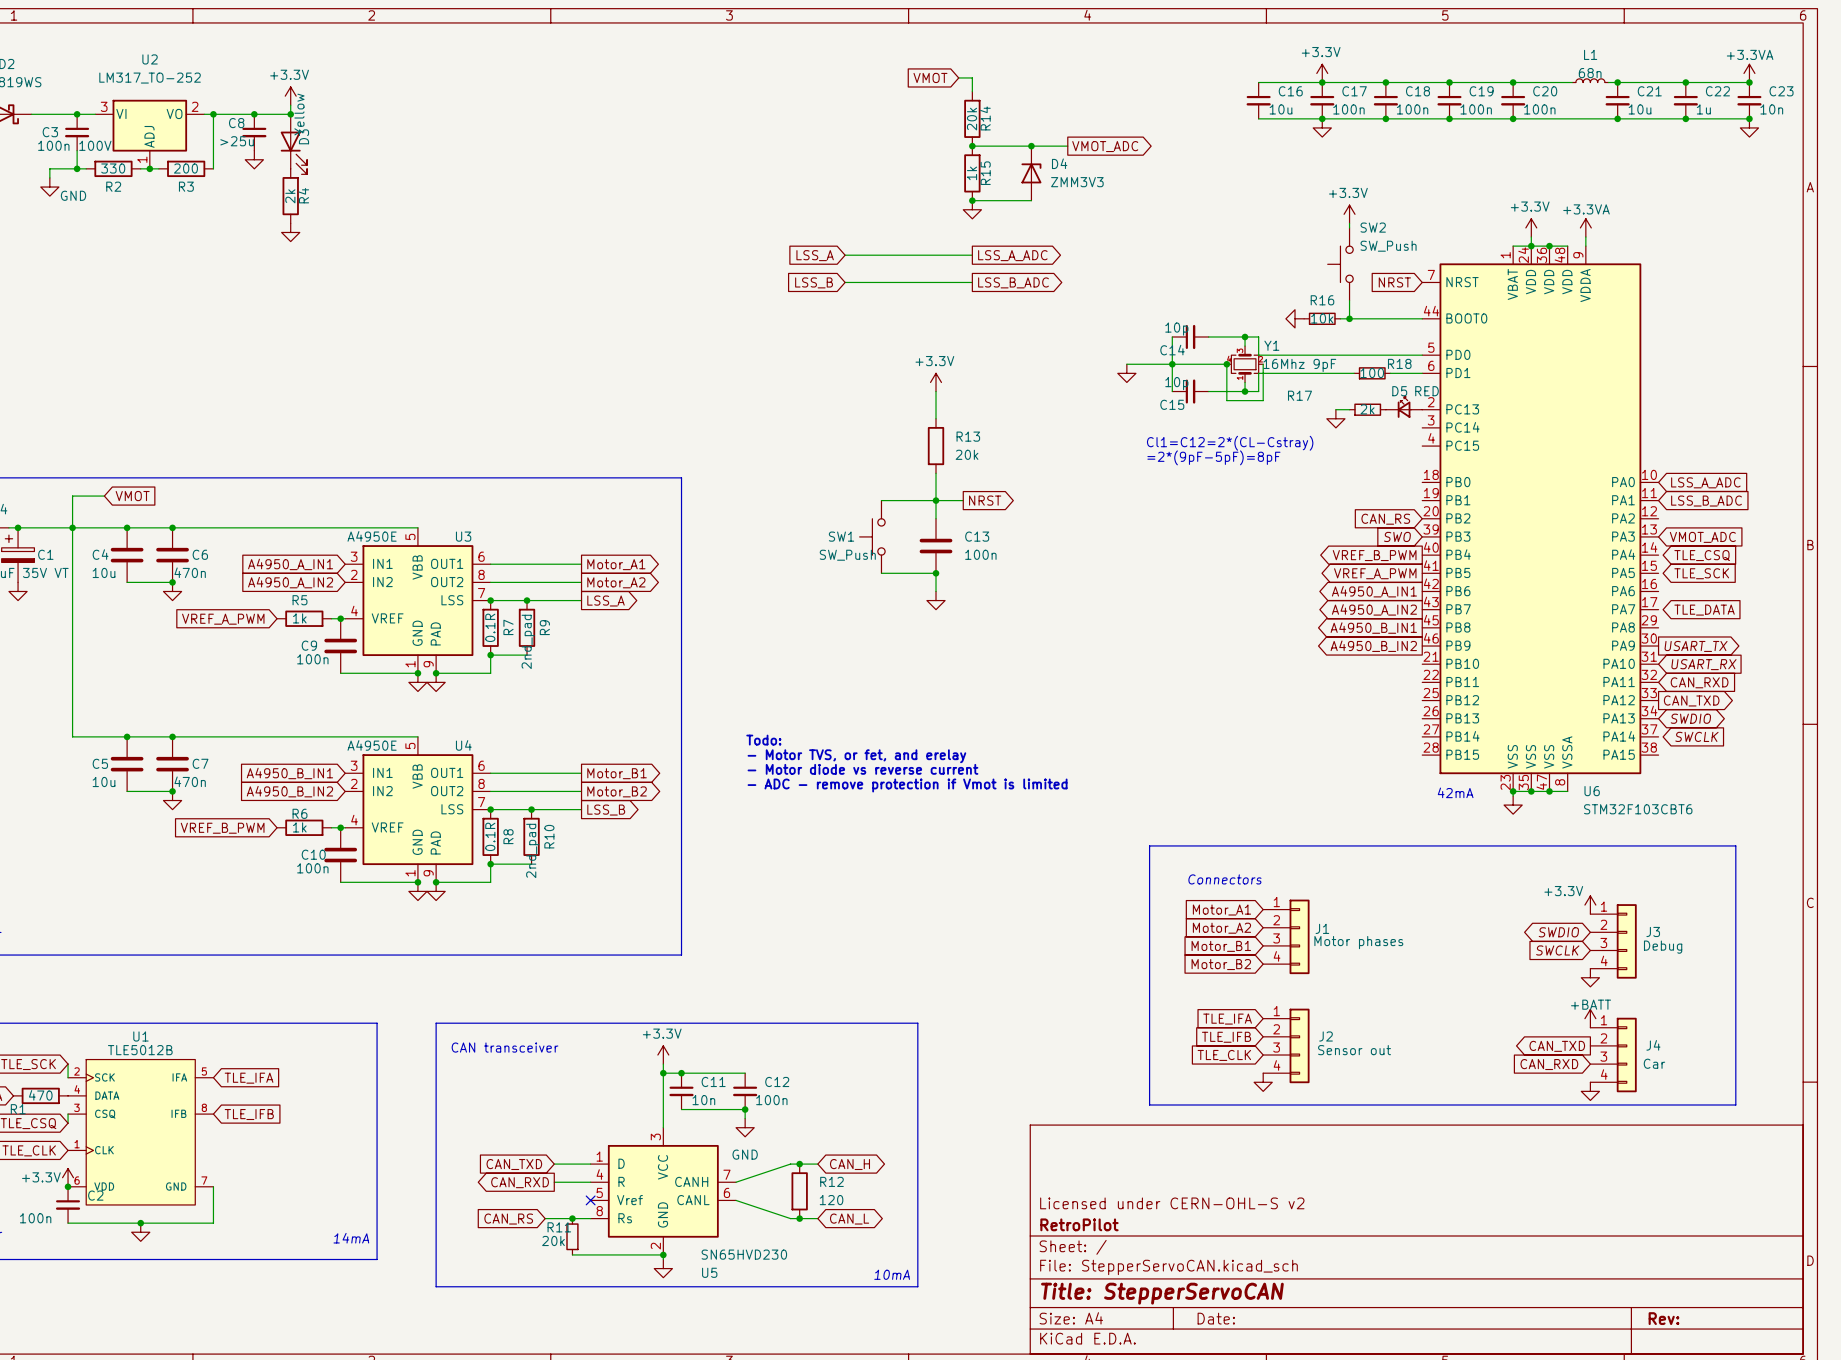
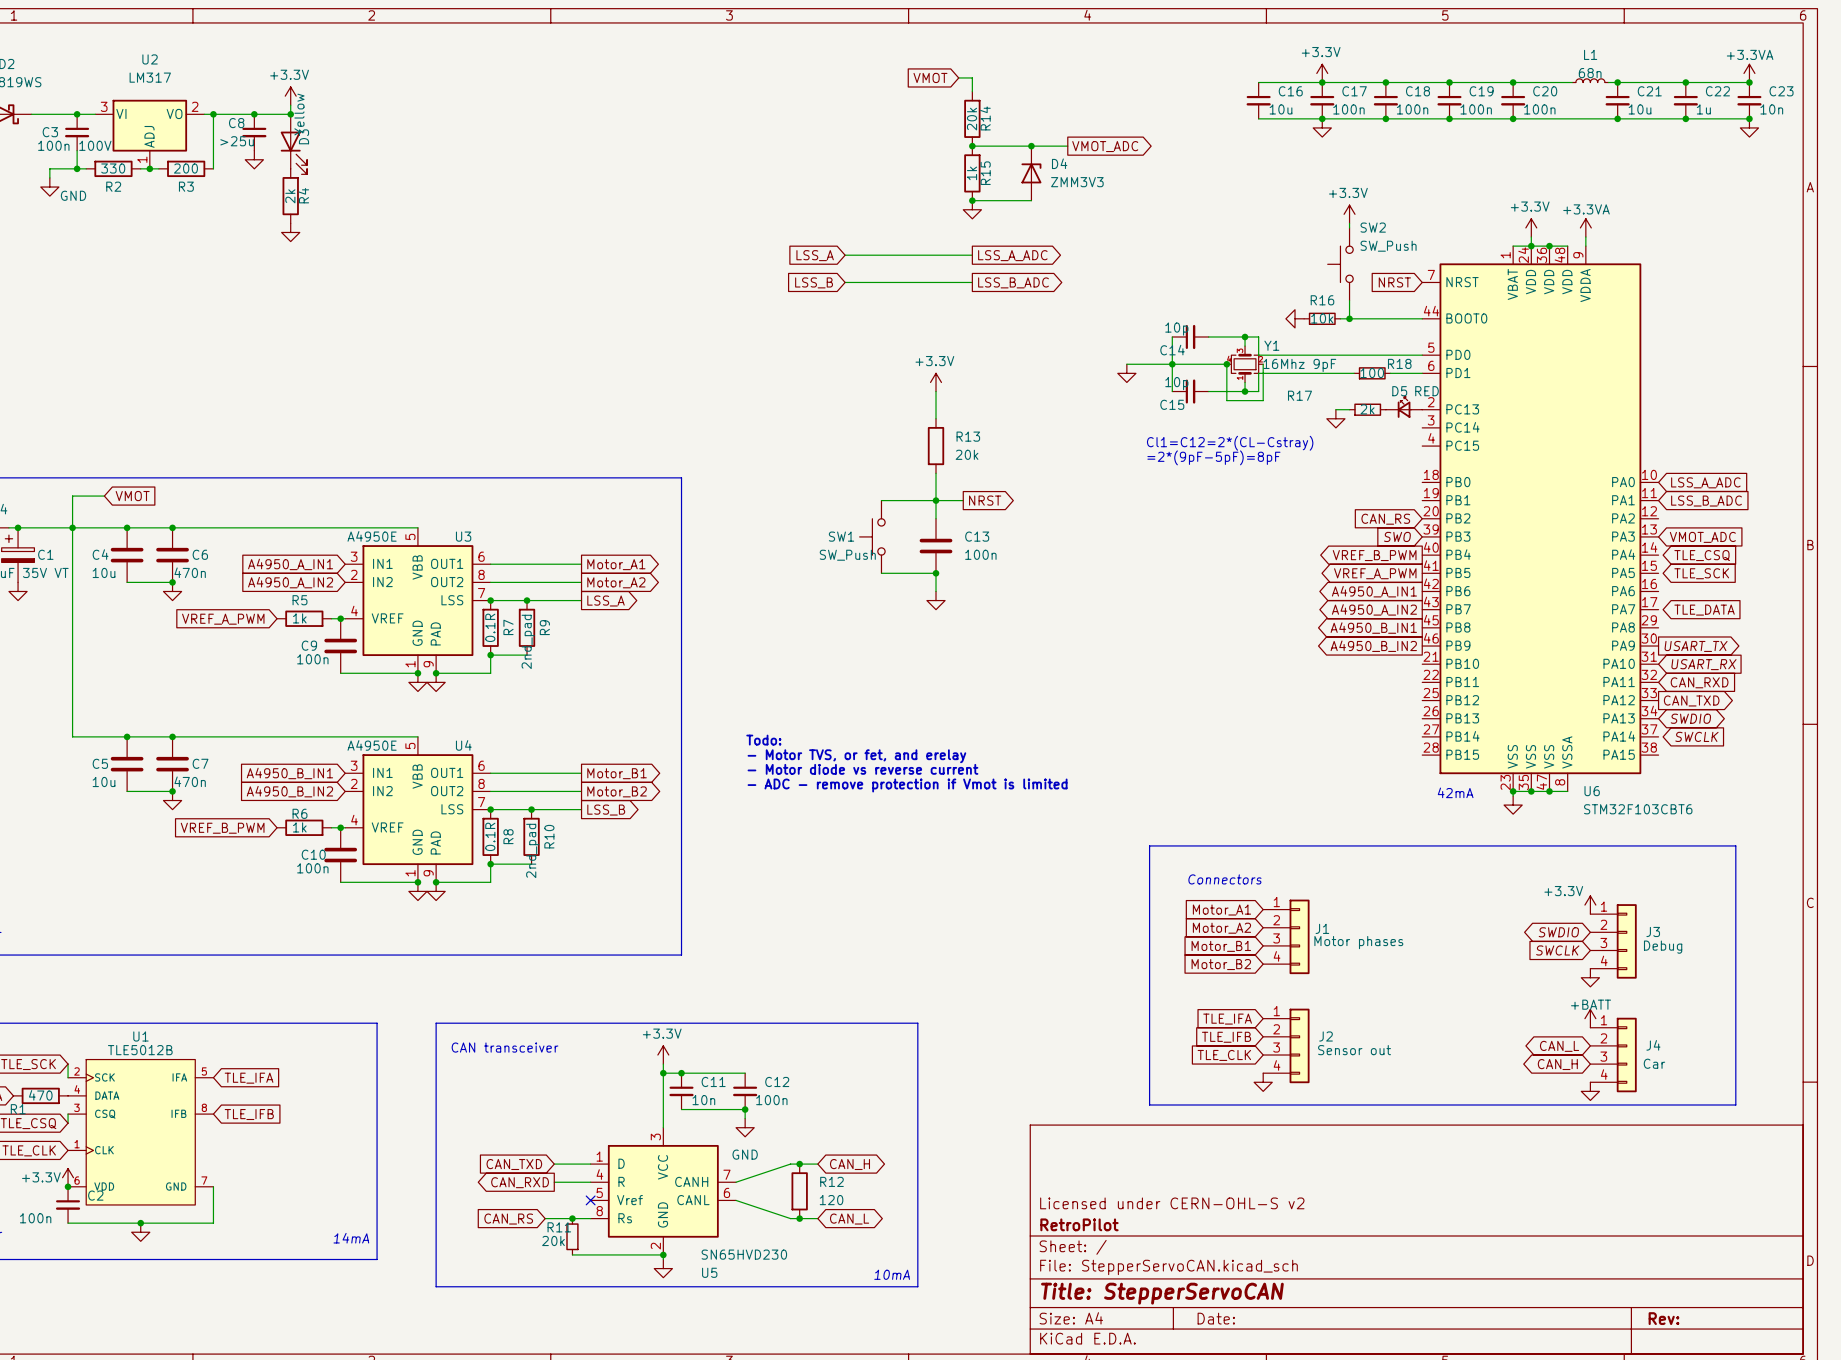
U2 value: LM317_TO-252 (150, 78) -> LM317 (150, 77)
global label shape: output (1557, 1046) -> bidirectional (1559, 1046)
global label: CAN_TXD (1557, 1046) -> CAN_L (1559, 1046)
global label shape: input (1549, 1064) -> bidirectional (1557, 1064)
global label: CAN_RXD (1549, 1064) -> CAN_H (1557, 1064)

